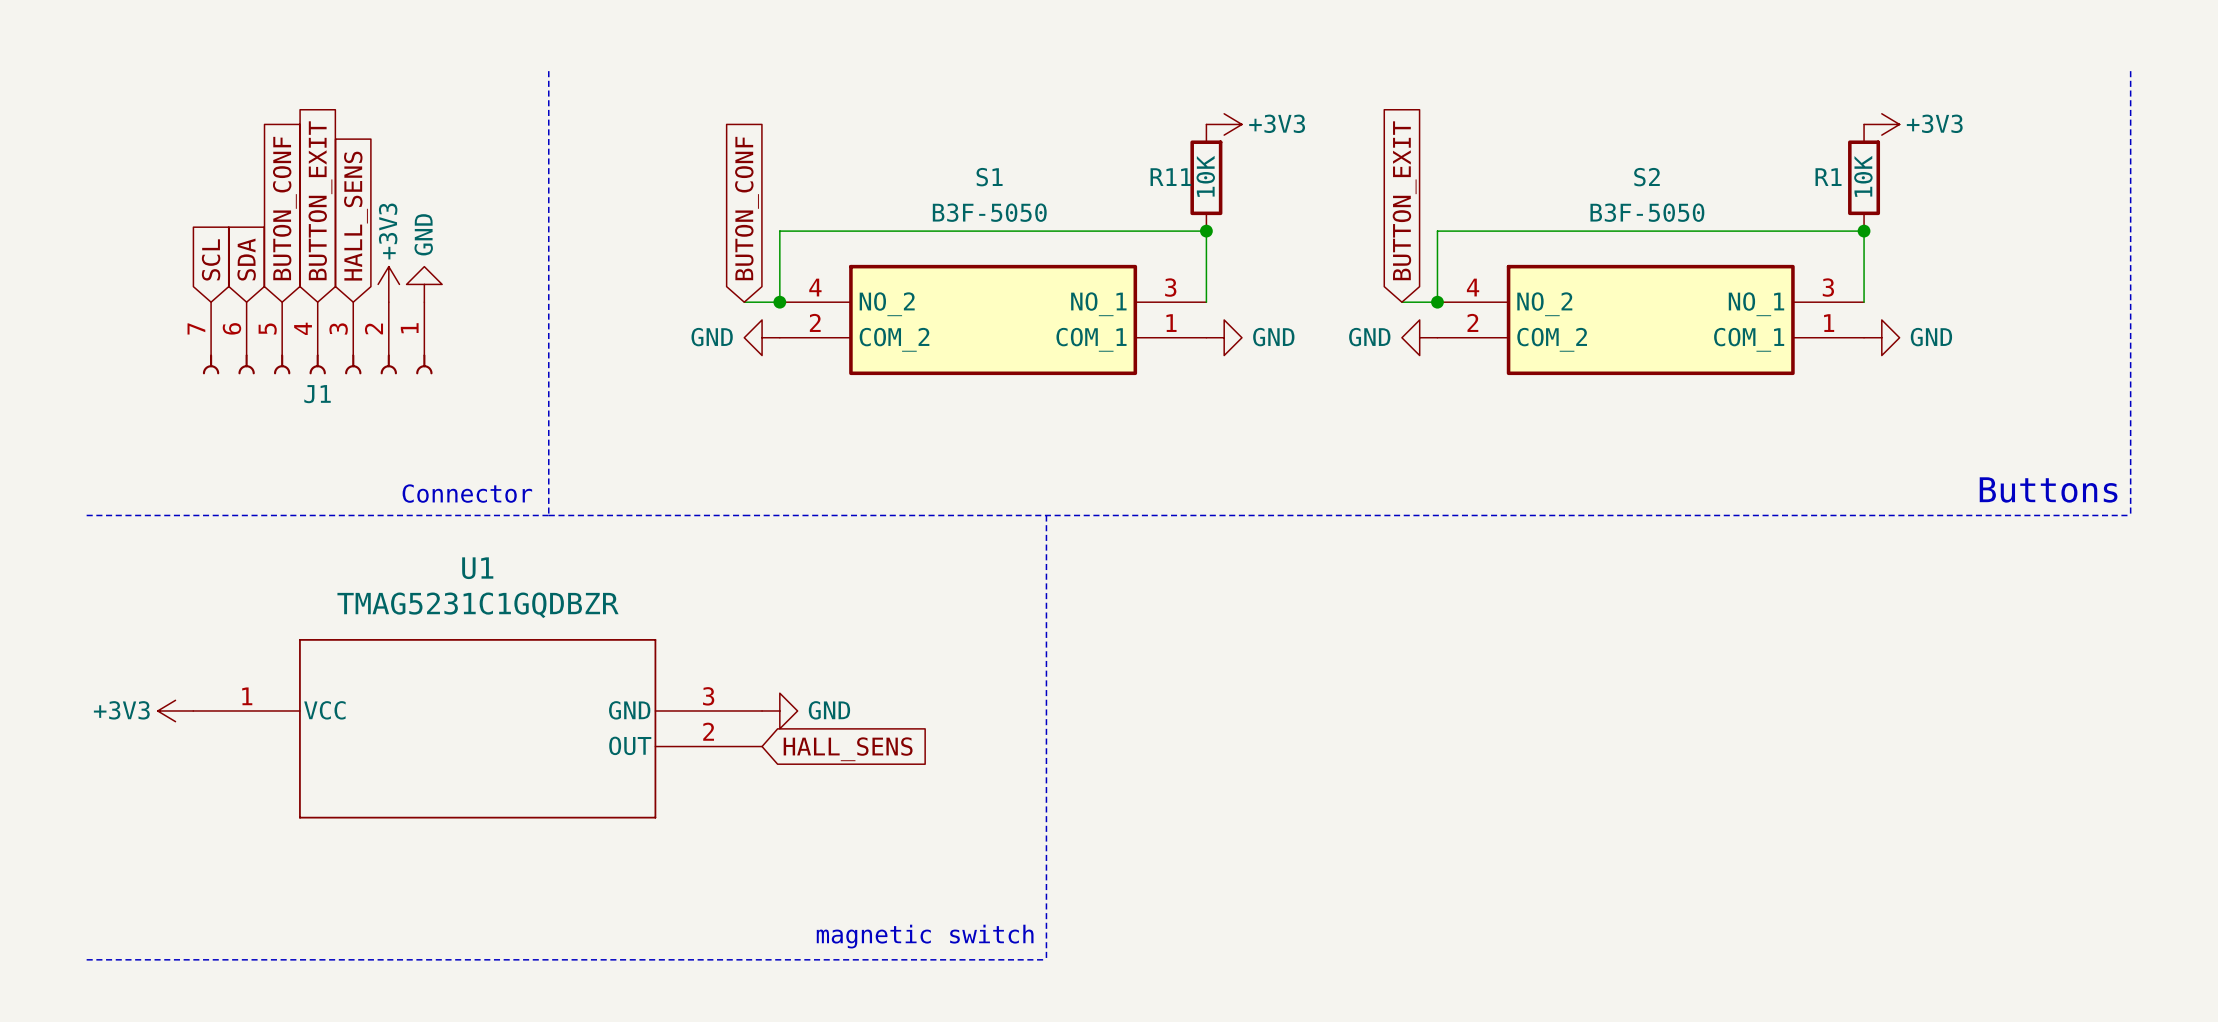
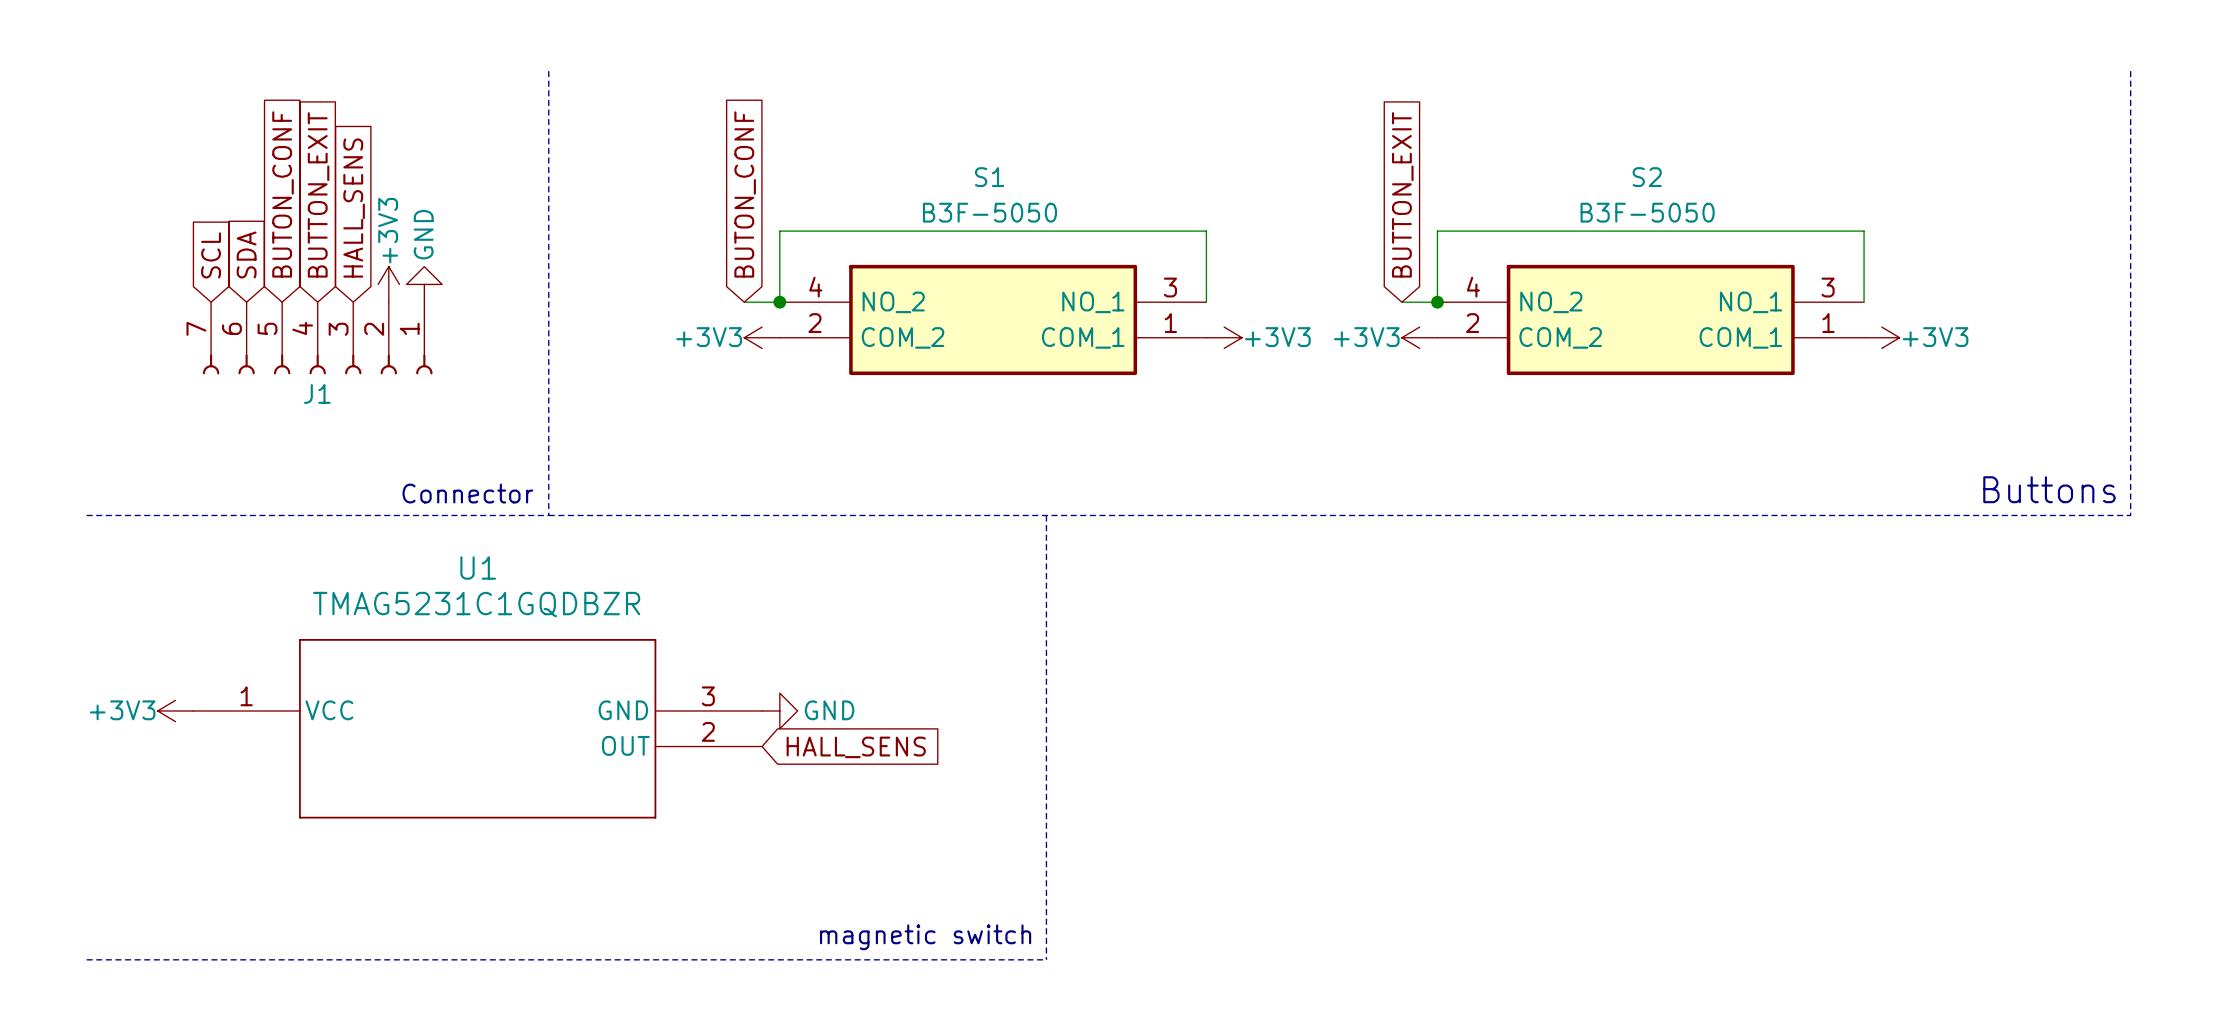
power symbol: +3V3 (1224, 124) -> none
power symbol: +3V3 (1881, 124) -> none
R11: 10K (1206, 177) -> none
R1: 10K (1864, 177) -> none
junction: (1206, 231) -> none
junction: (1864, 231) -> none
power symbol: GND (762, 337) -> +3V3 (762, 337)
power symbol: GND (1224, 337) -> +3V3 (1224, 337)
power symbol: GND (1419, 337) -> +3V3 (1419, 337)
power symbol: GND (1881, 337) -> +3V3 (1881, 337)

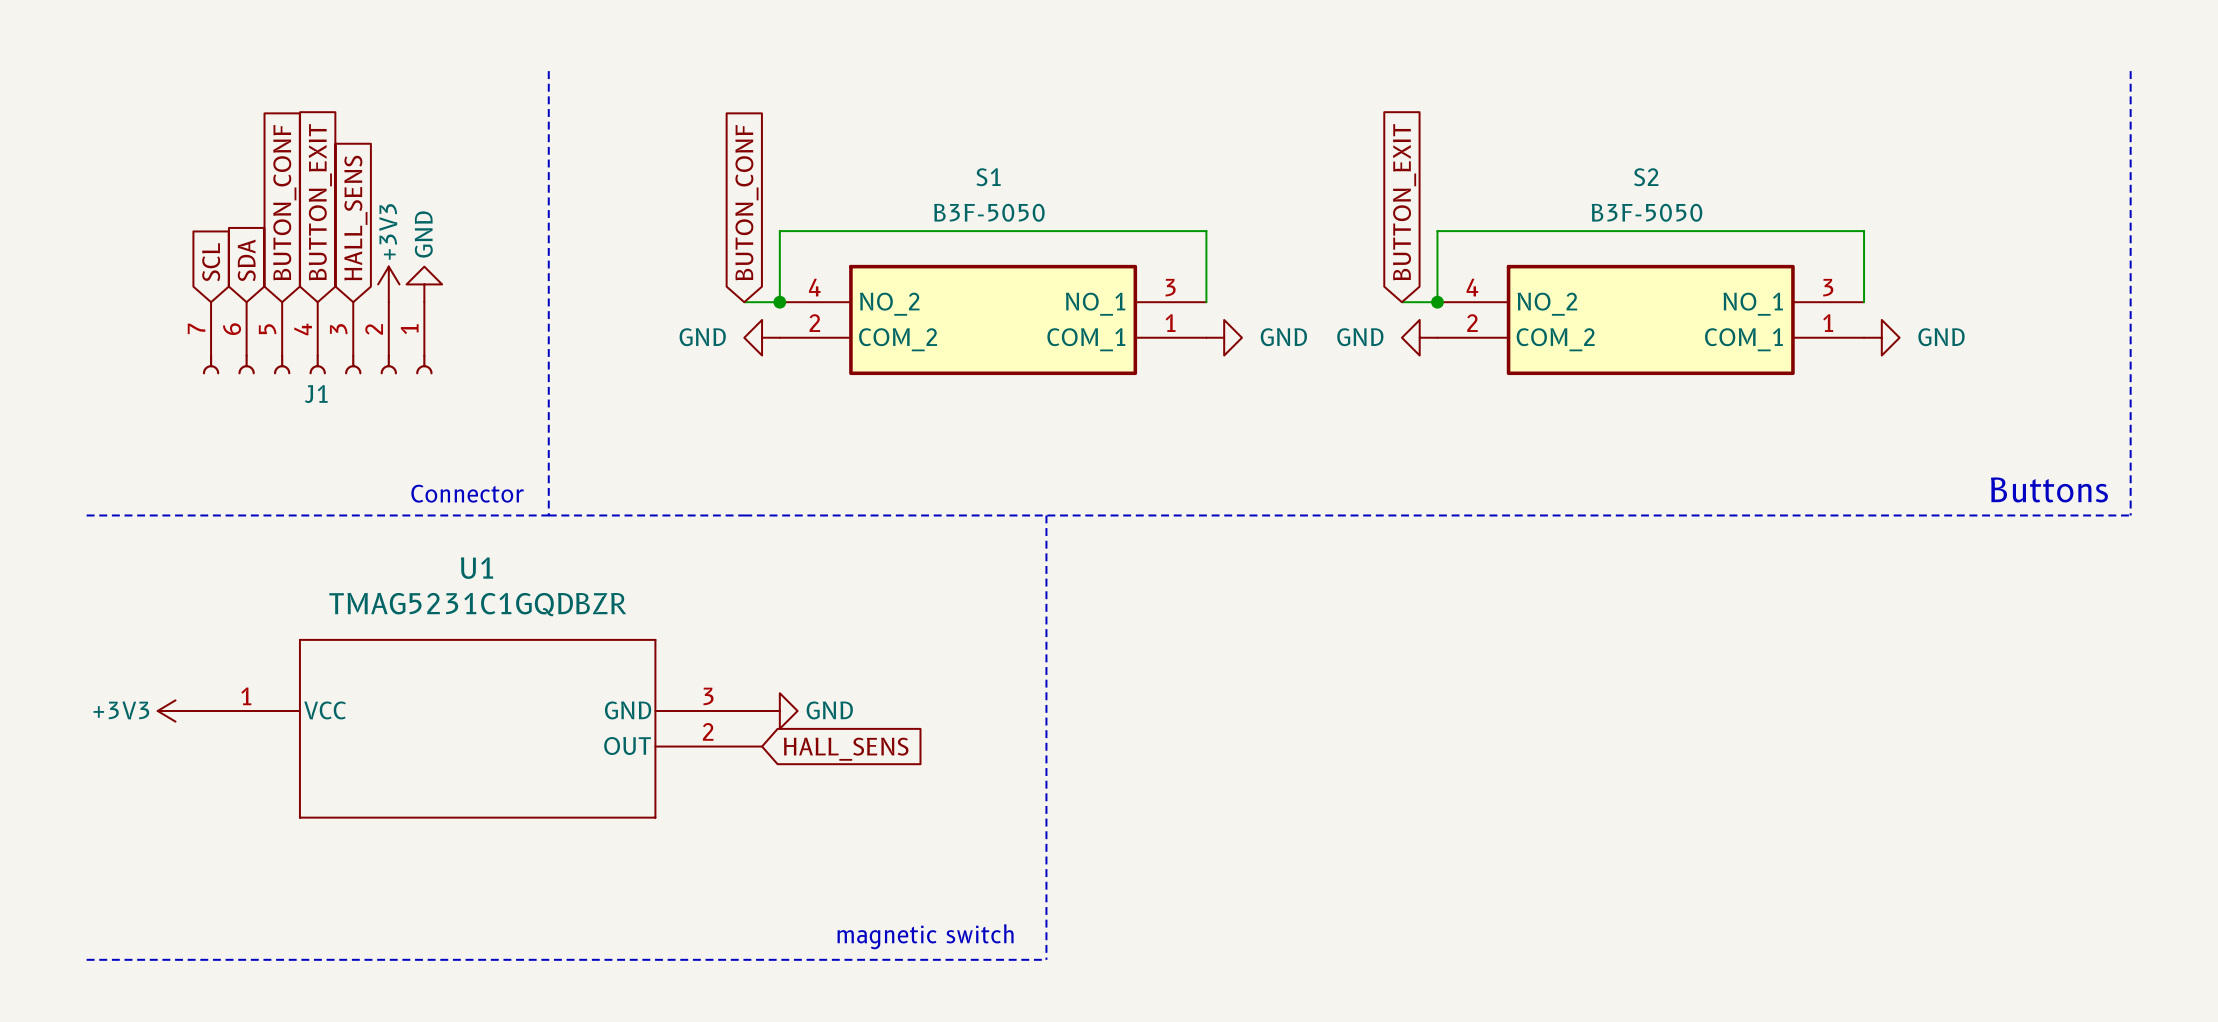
power symbol: +3V3 (762, 337) -> GND (762, 337)
power symbol: +3V3 (1224, 337) -> GND (1224, 337)
power symbol: +3V3 (1419, 337) -> GND (1419, 337)
power symbol: +3V3 (1881, 337) -> GND (1881, 337)

